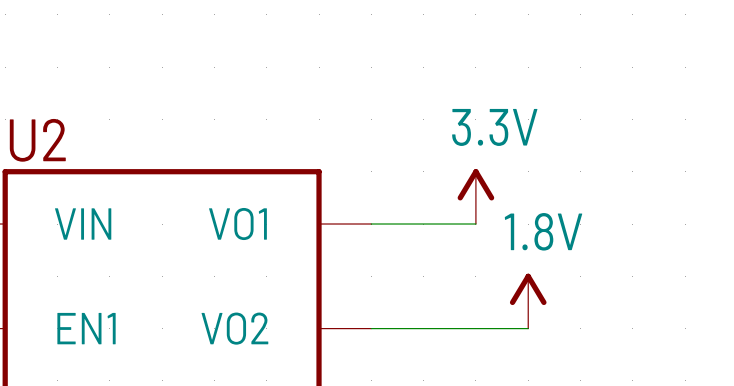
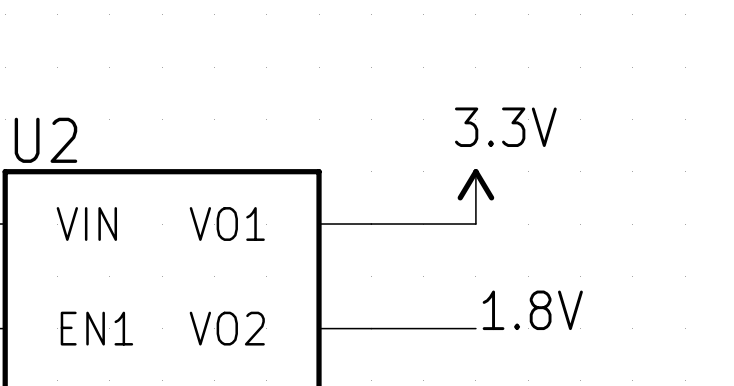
power symbol: 1.8V (528, 301) -> none
label: none -> 1.8V (532, 310)
wire: (475, 328) (528, 328) -> none

